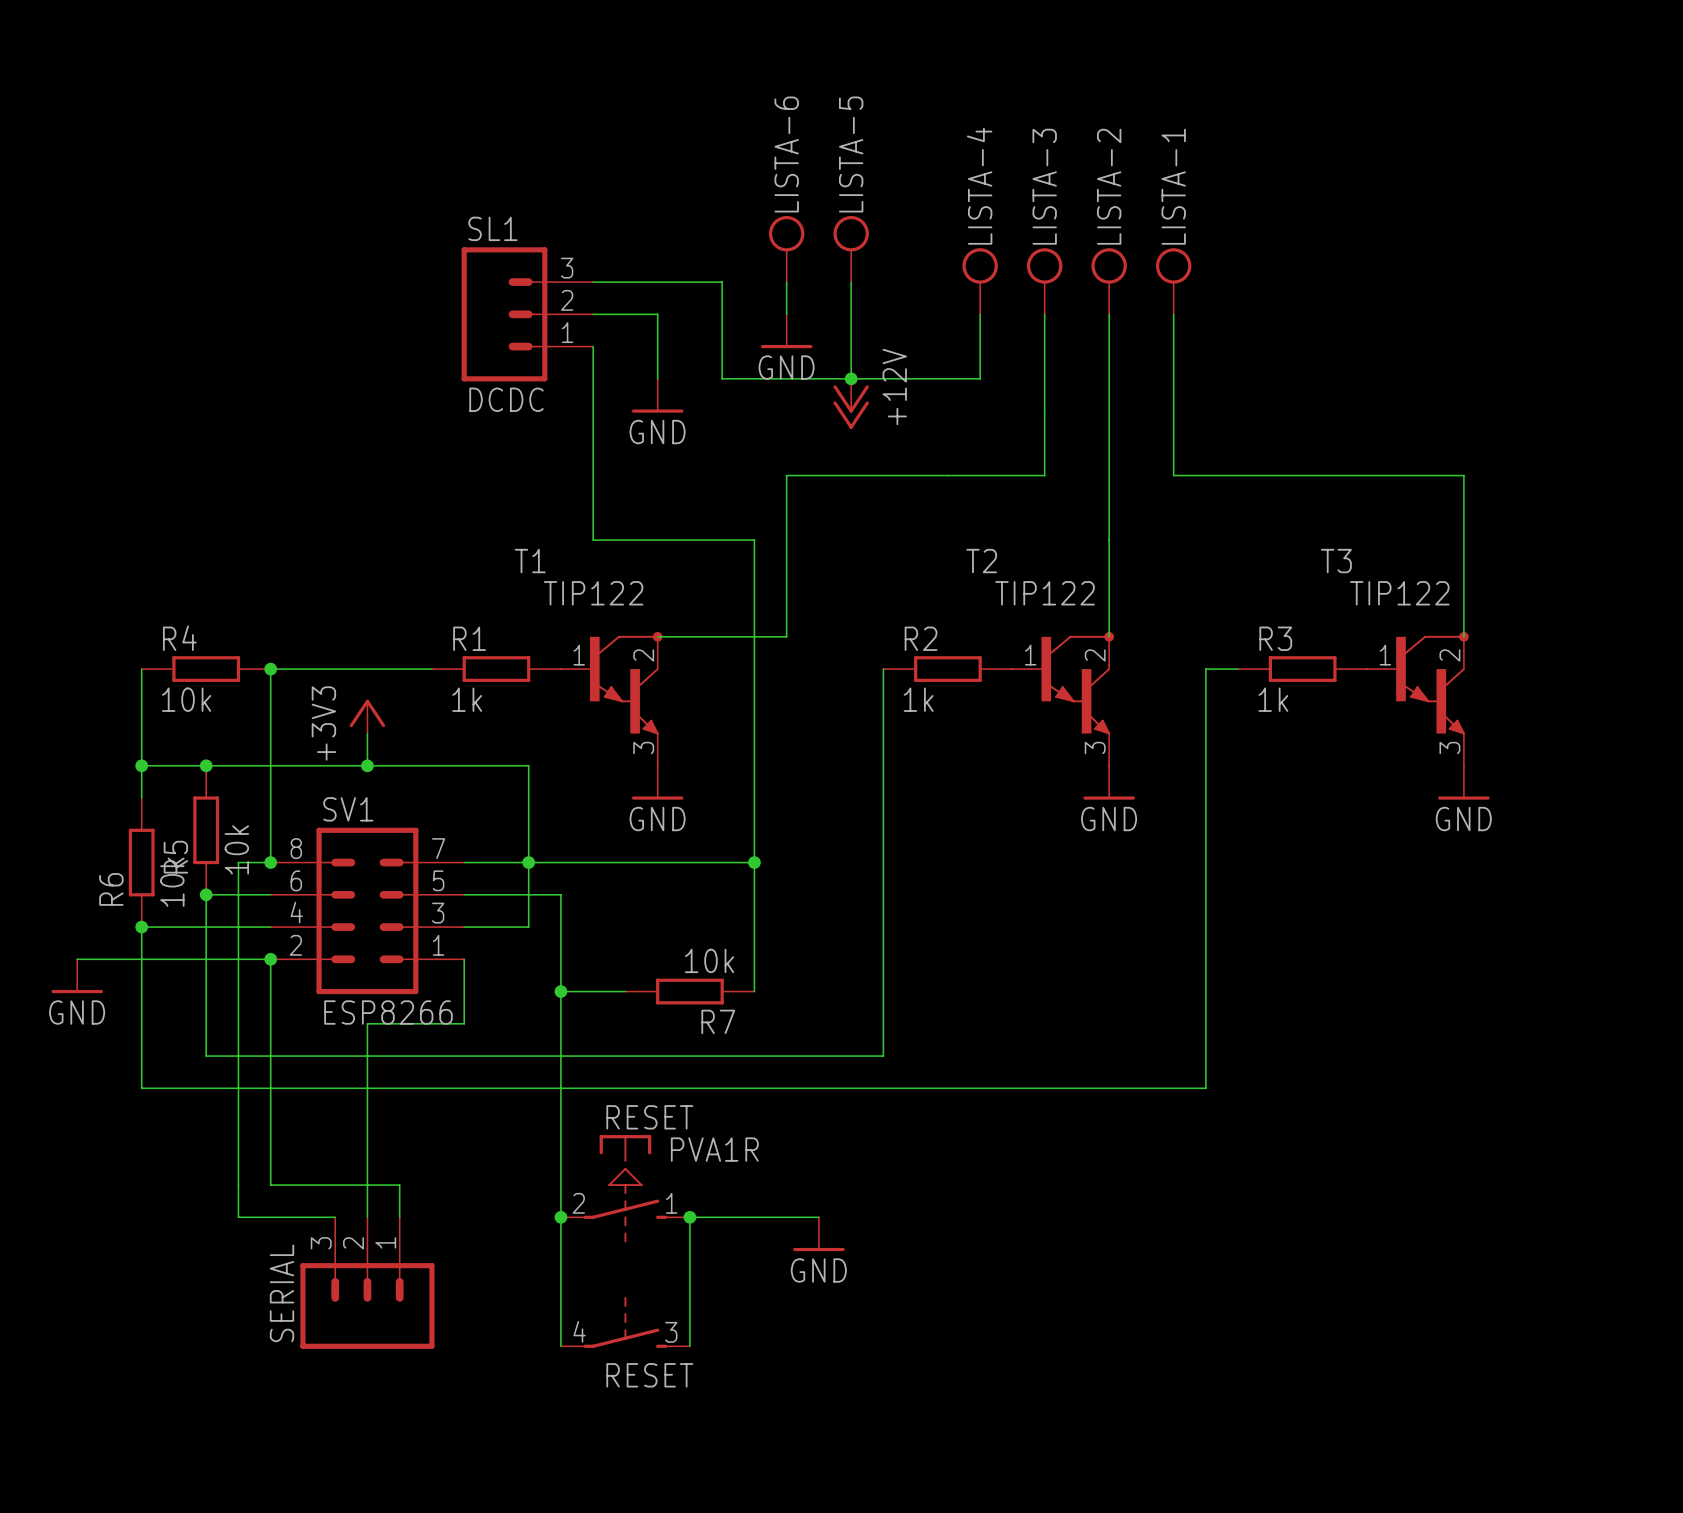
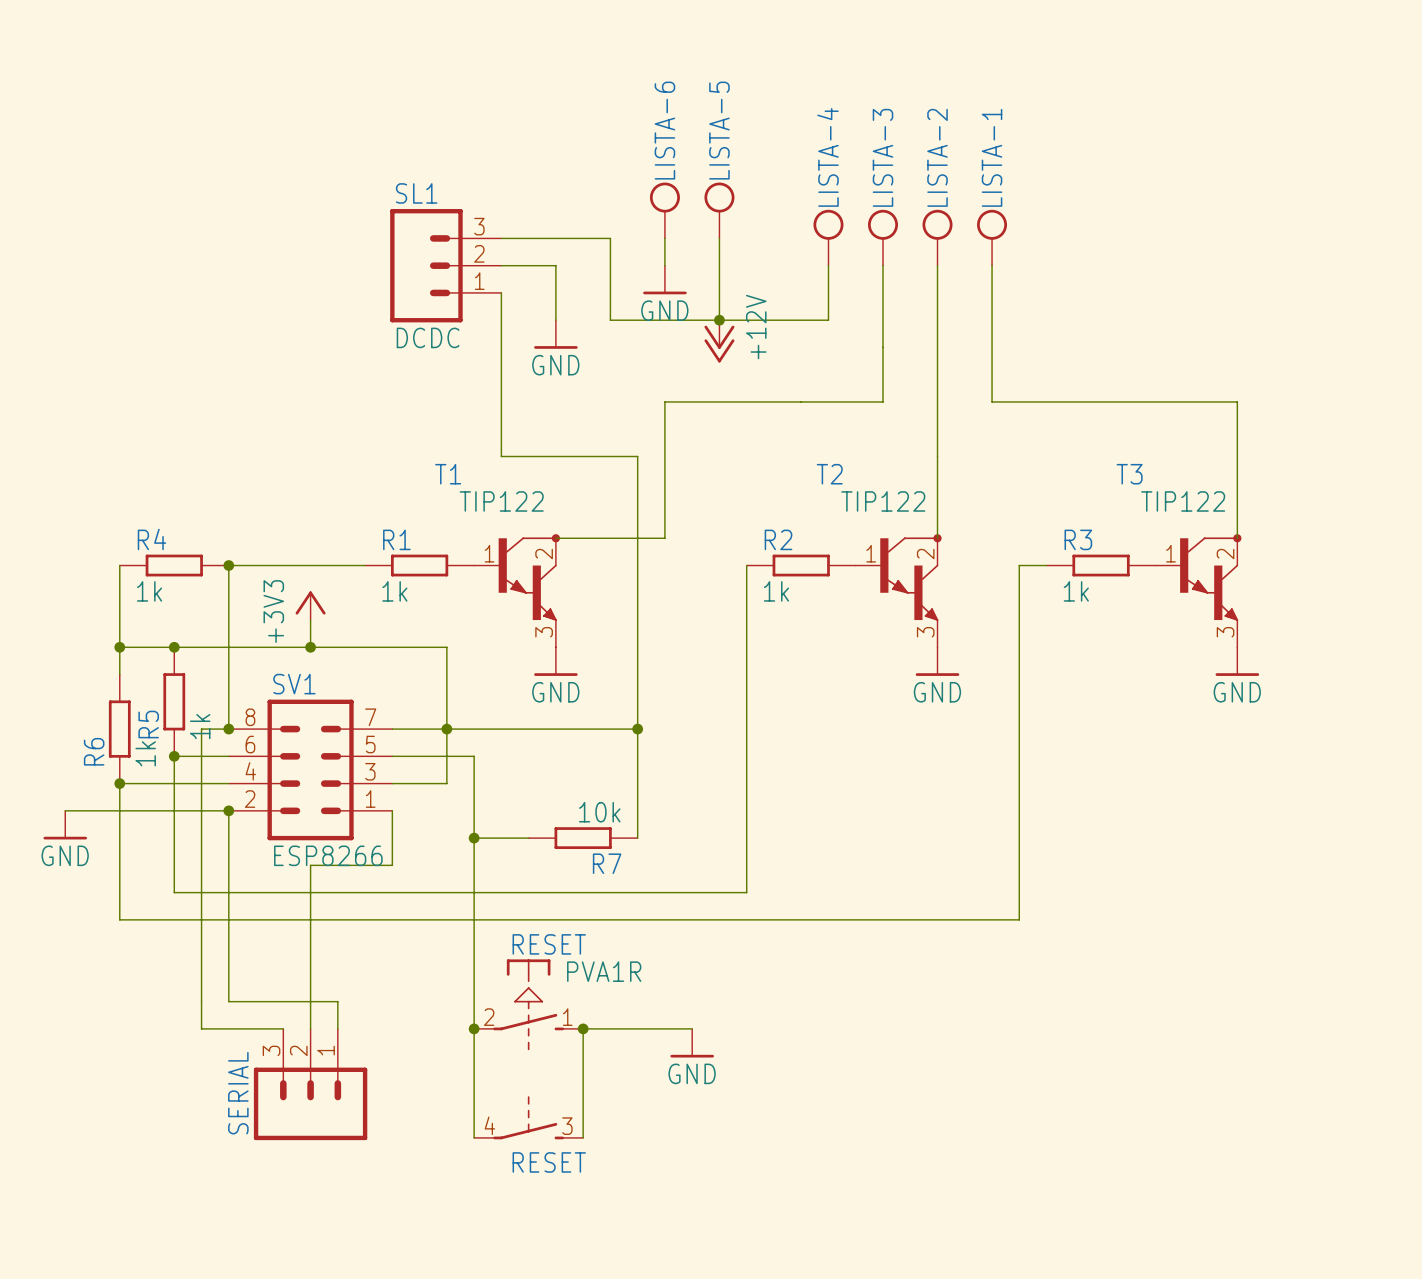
R4 value: 10k (186, 699) -> 1k (149, 591)
R5 value: 10k (236, 849) -> 1k (200, 726)
R6 value: 10k (172, 882) -> 1k (145, 753)

